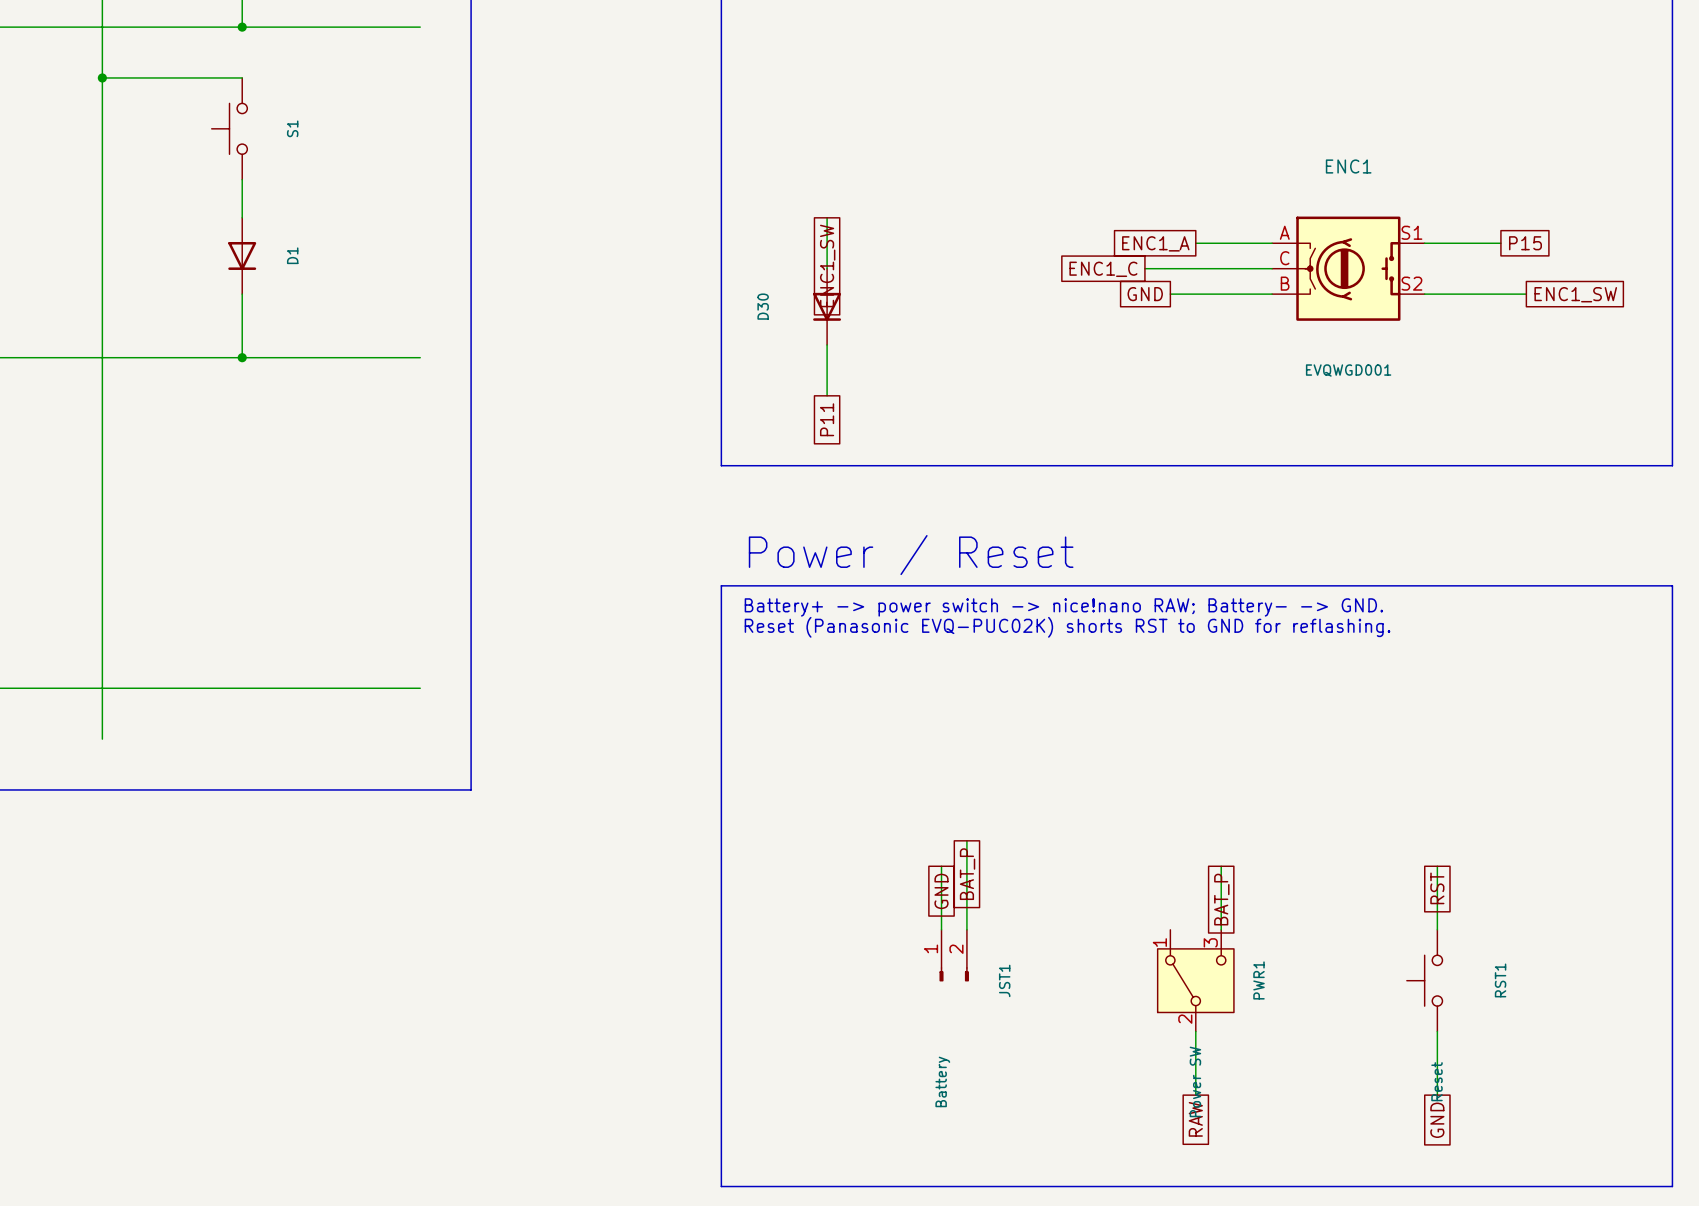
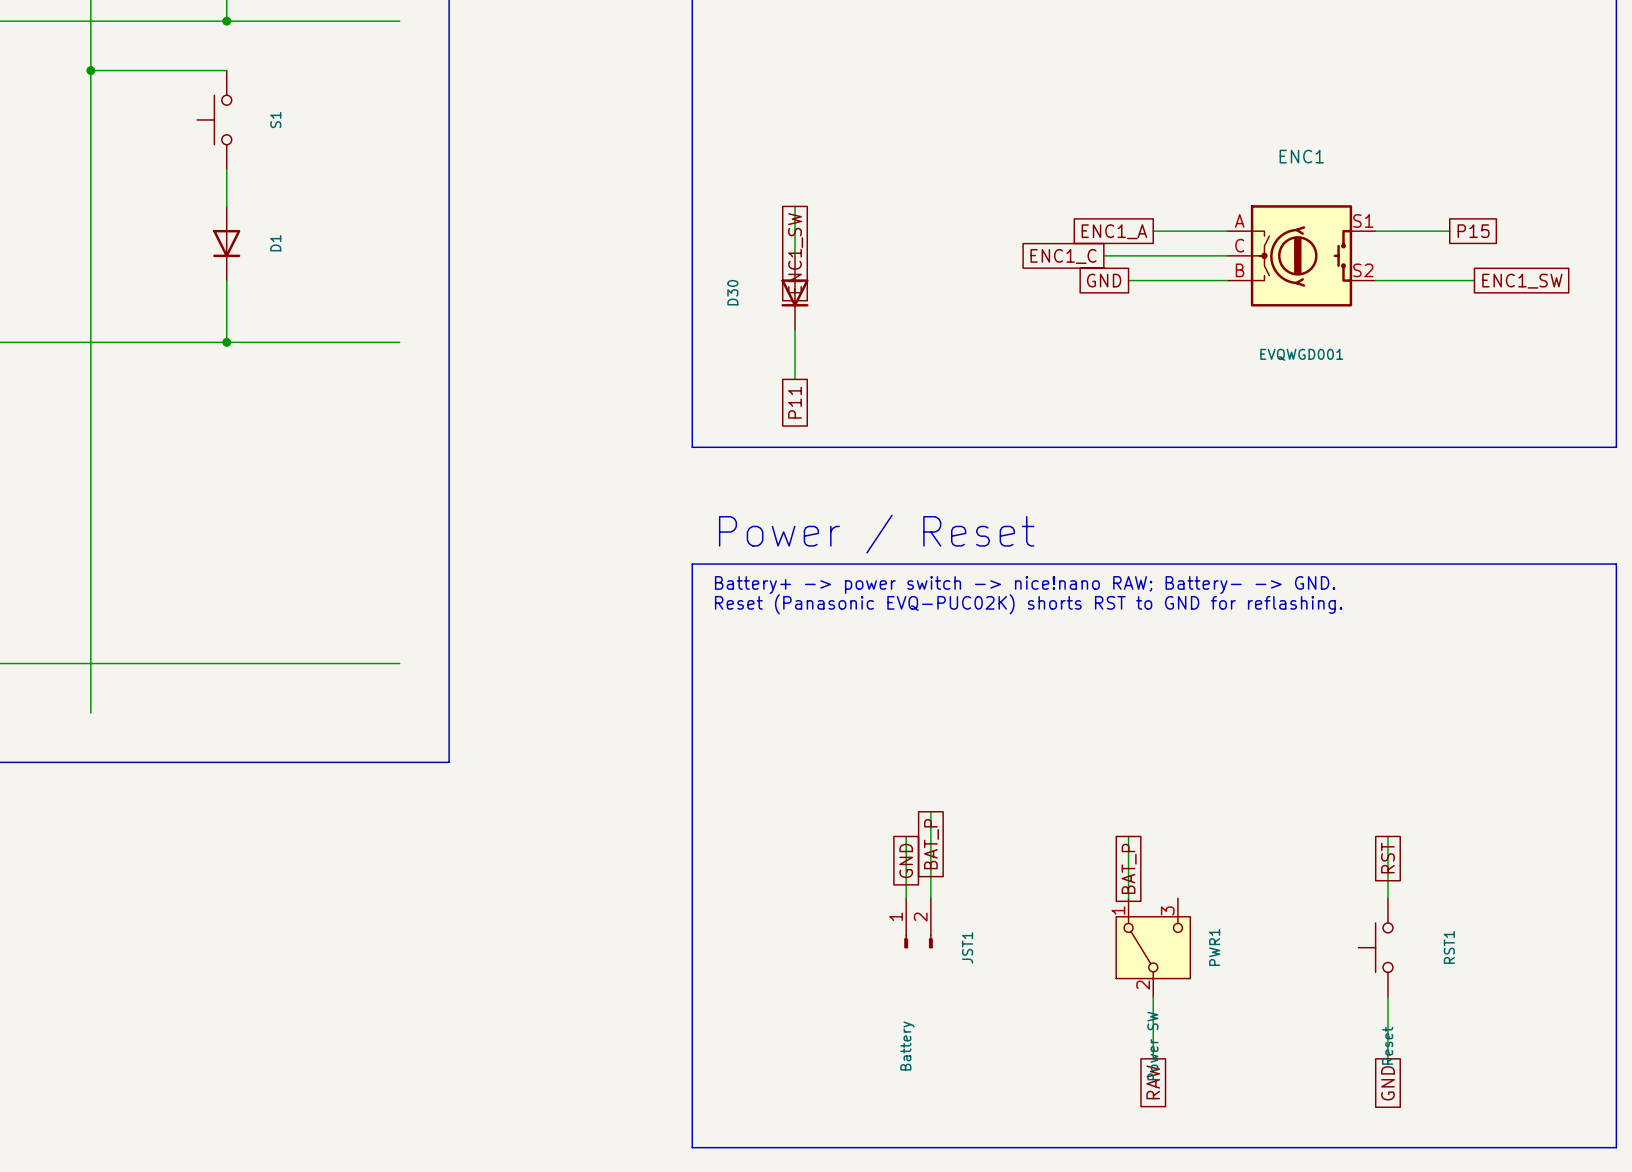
wire: (1221, 866) (1221, 929) -> (1128, 836) (1128, 898)
global label position: BAT_P (1221, 899) -> BAT_P (1129, 868)

